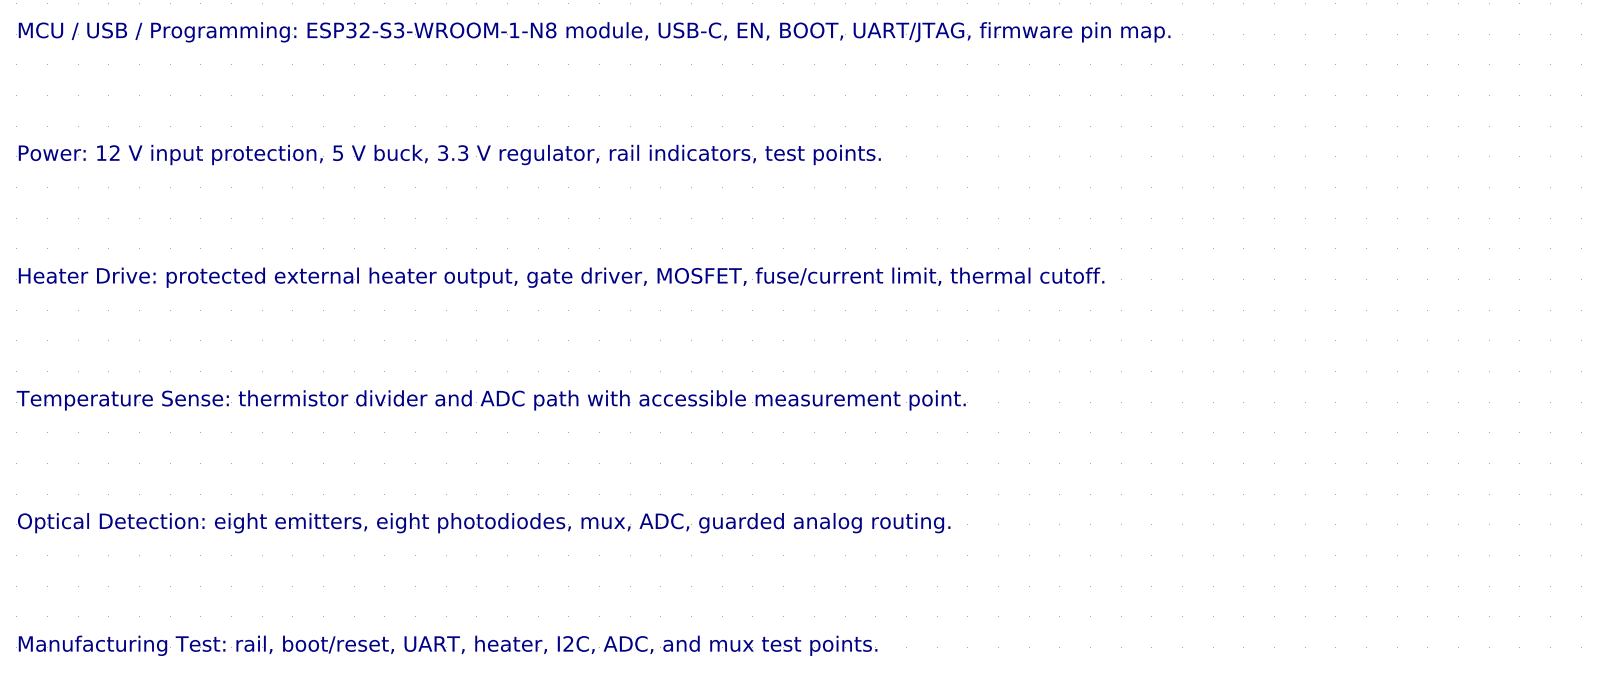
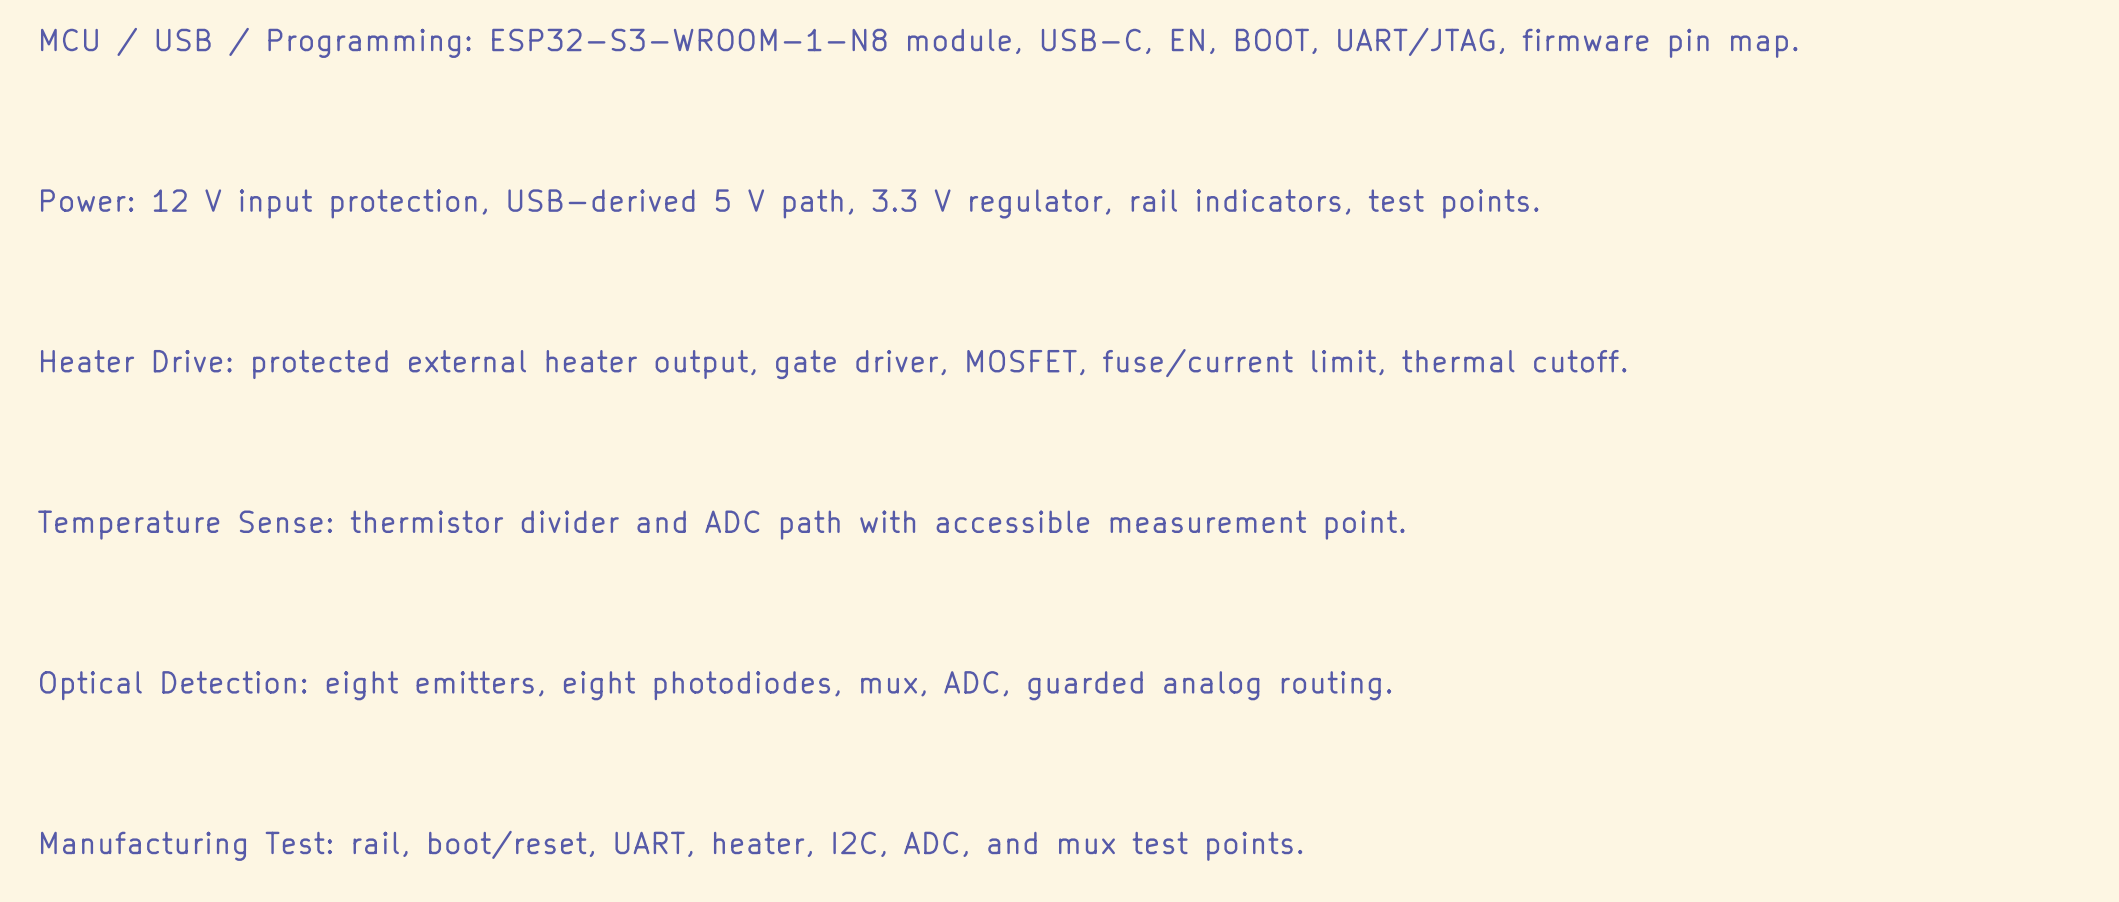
text: Power: 12 V input protection, 5 V buck, 3.3 V regulator, rail indicators, test points. (449, 155) -> Power: 12 V input protection, USB-derived 5 V path, 3.3 V regulator, rail indicators, test points. (789, 203)

